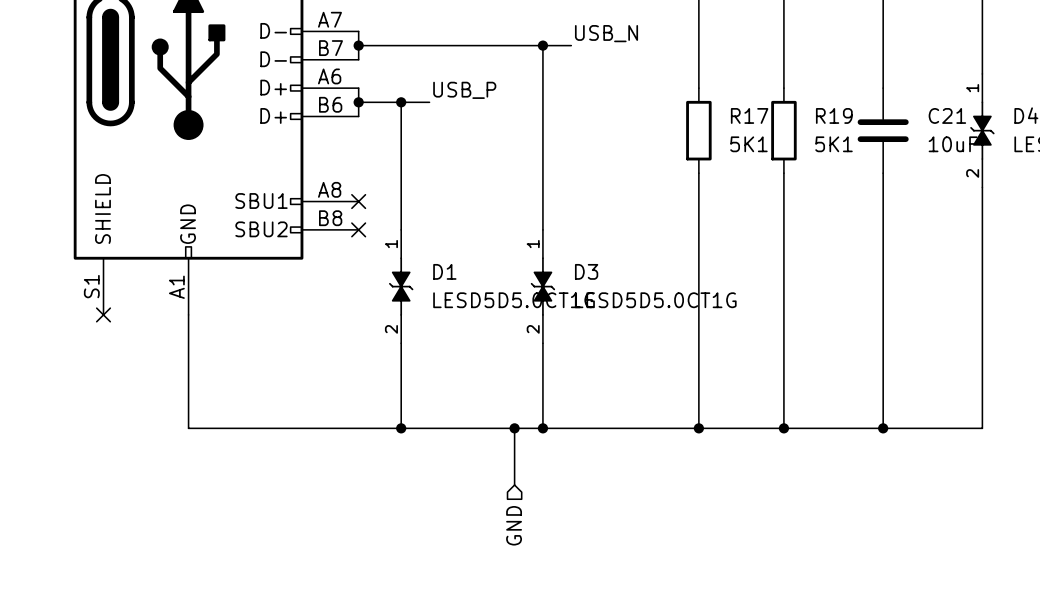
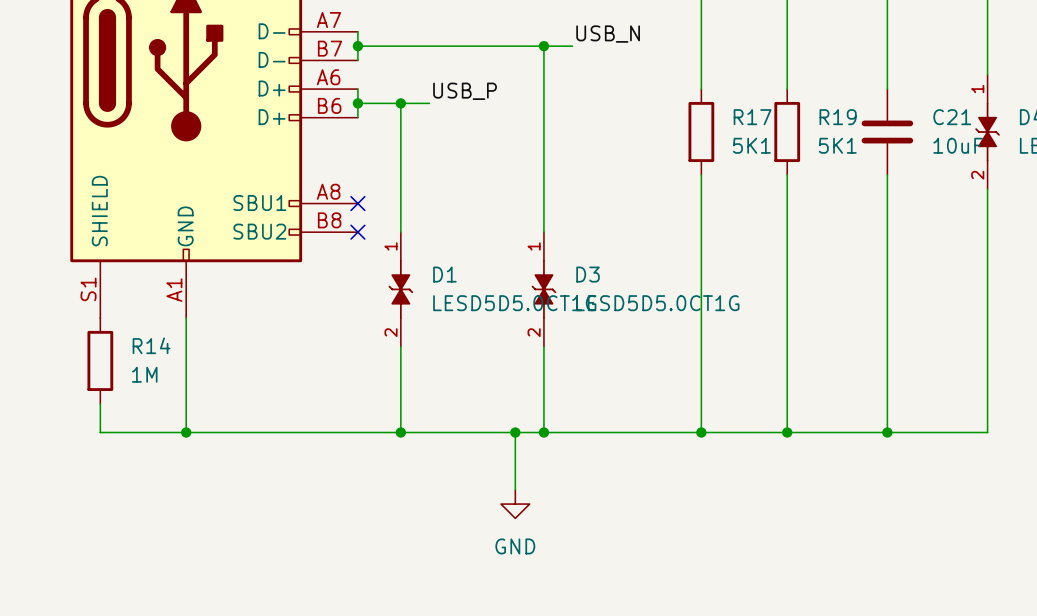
no-connect mark: (103, 314) -> none
R14: none -> 1M (100, 360)
wire: none -> (100, 403) (100, 432) (186, 432)
junction: none -> (186, 432)
power symbol: none -> GND (515, 504)
hierarchical label: GND (514, 525) -> none

